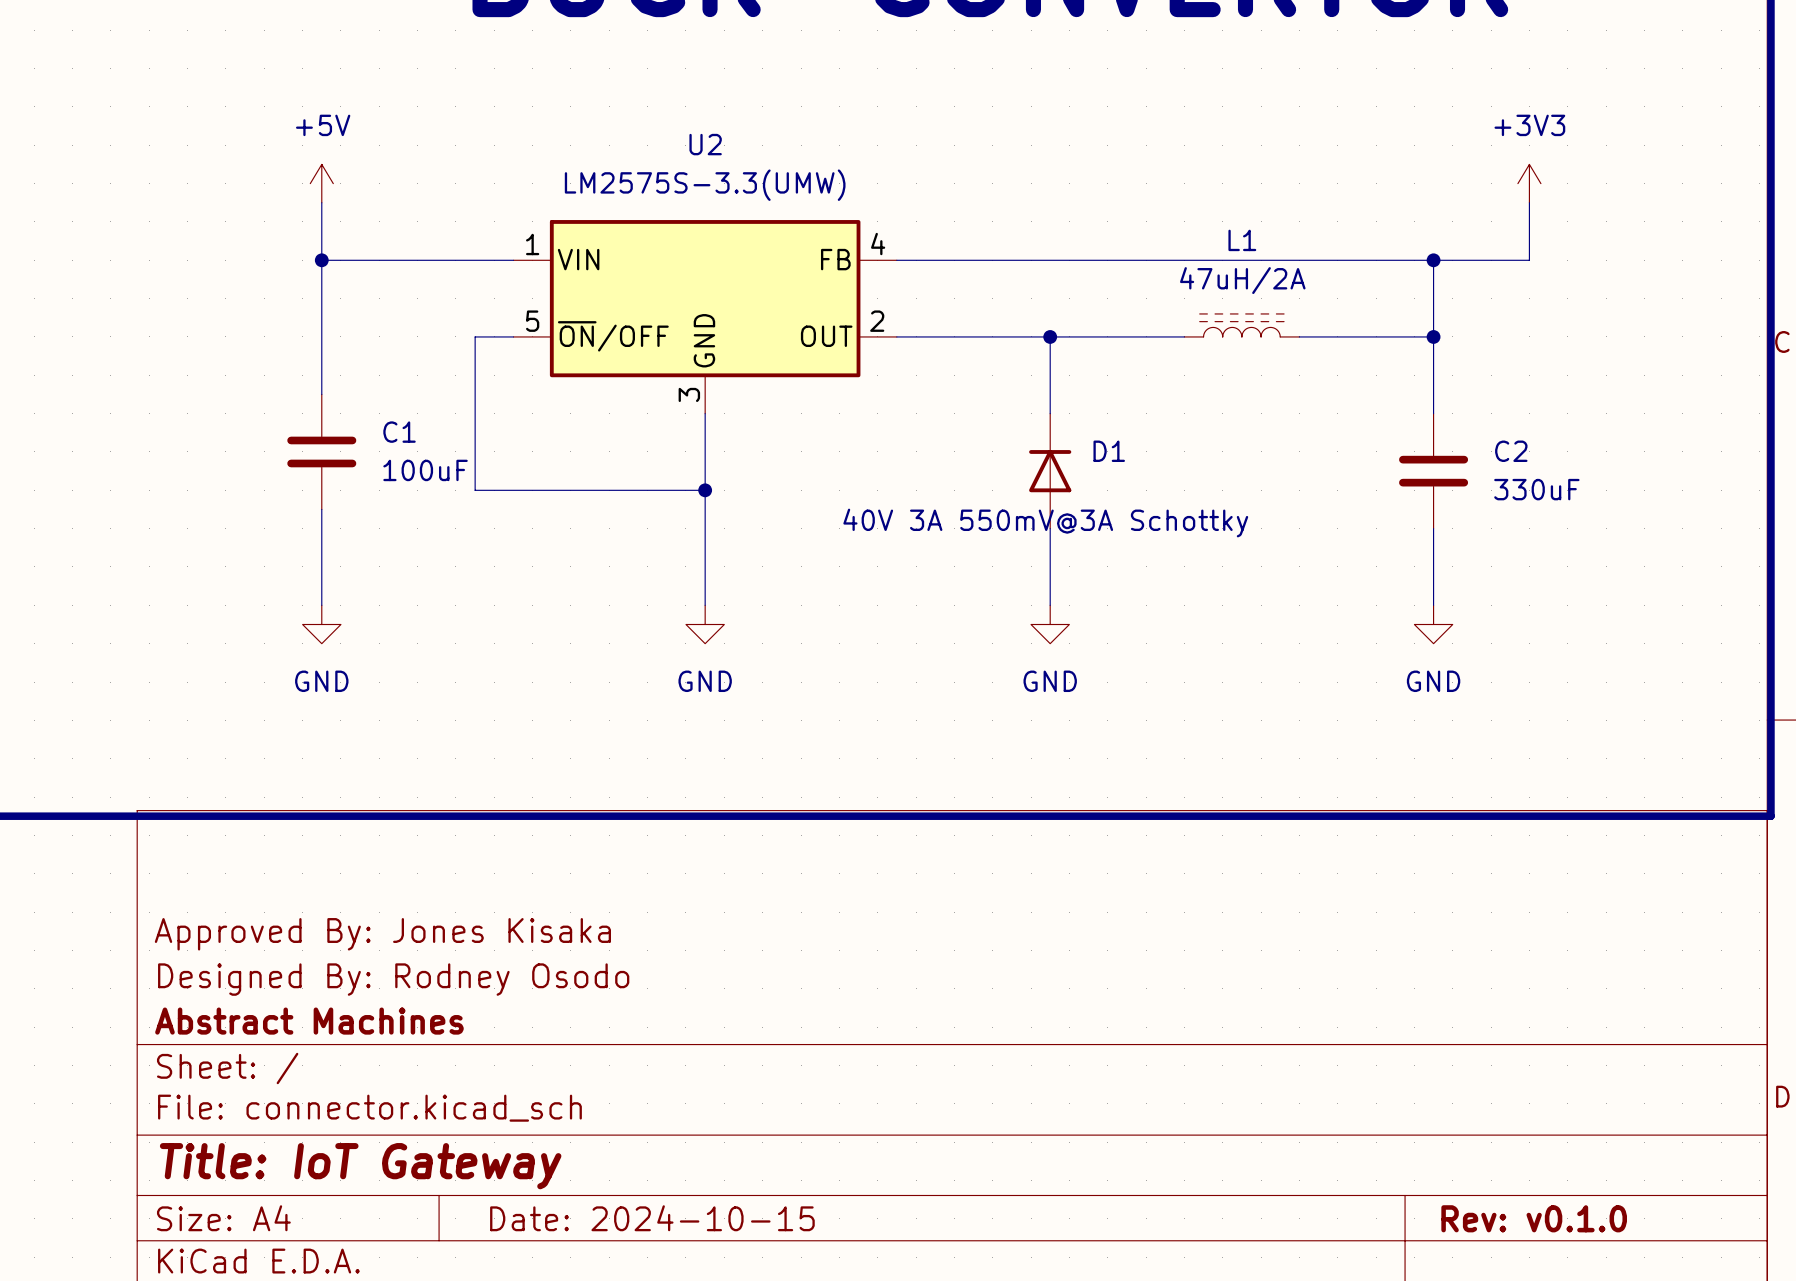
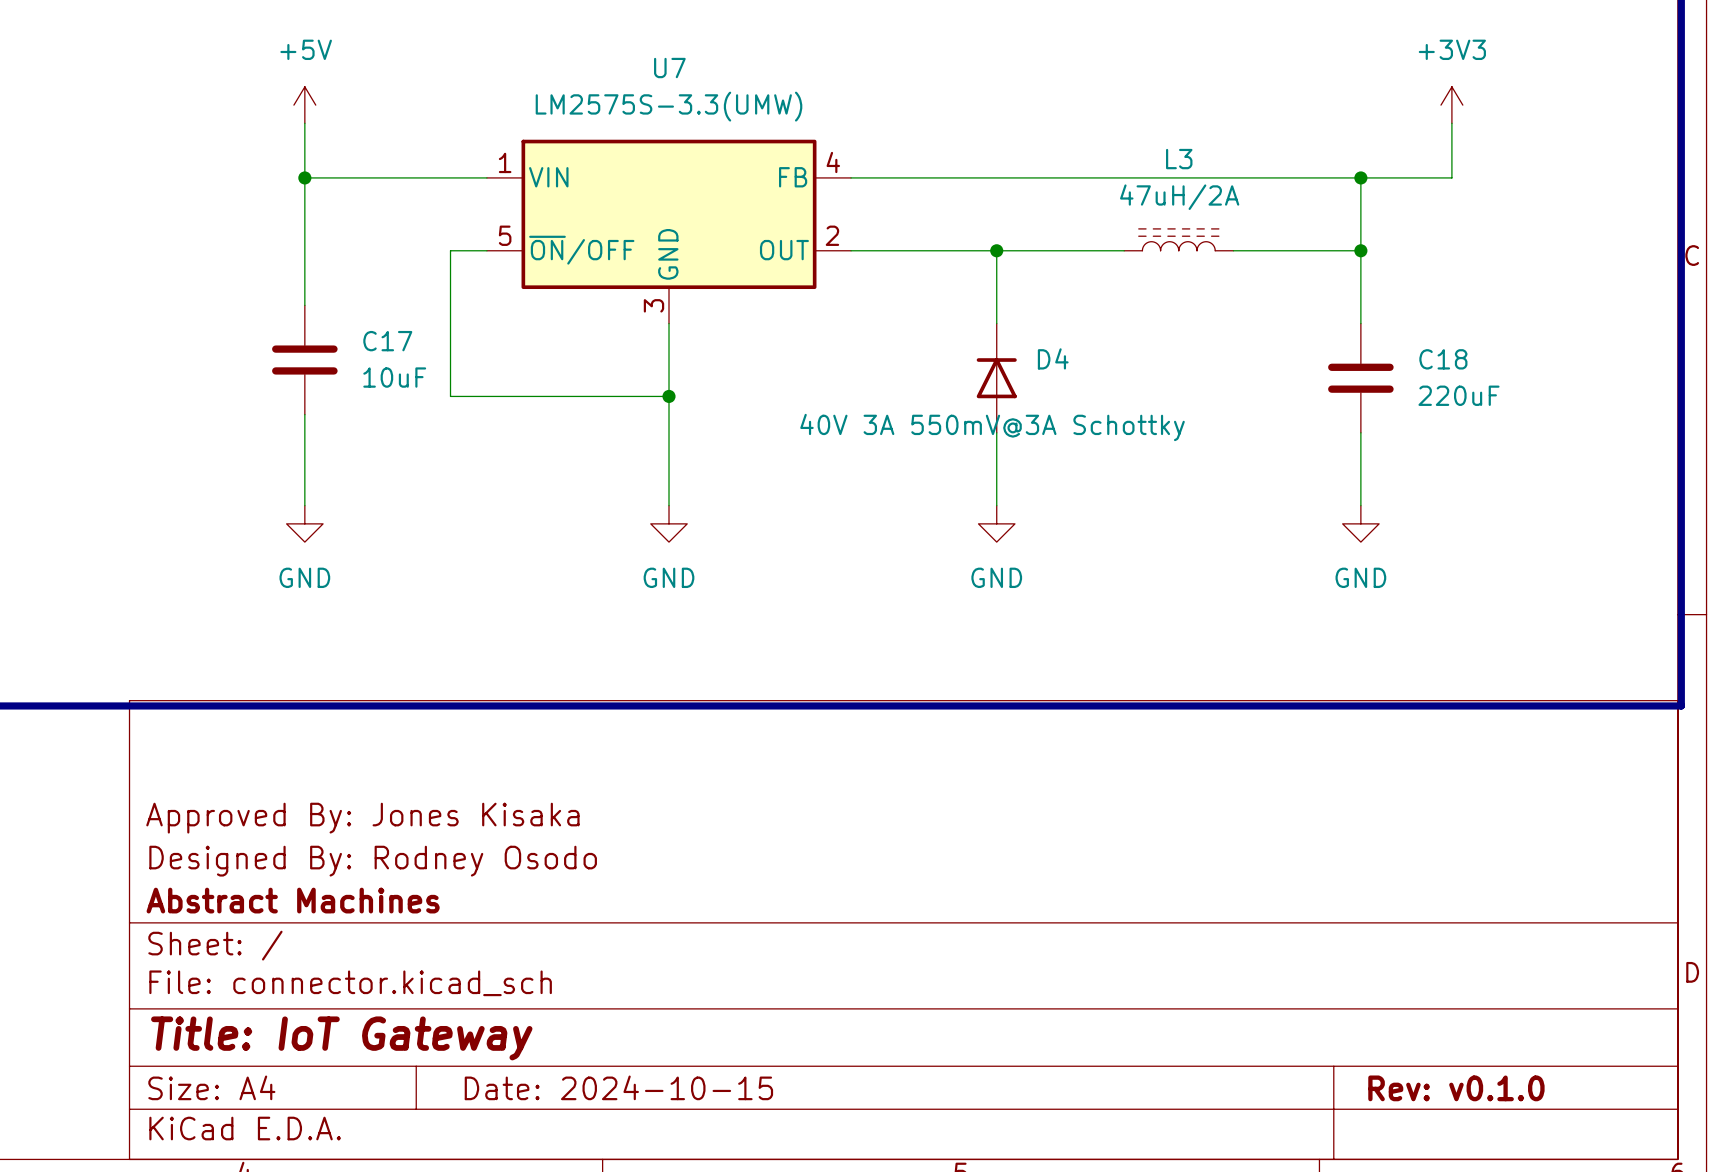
U2 name: U2 (705, 144) -> U7 (669, 68)
L1 name: L1 (1242, 240) -> L3 (1179, 159)
C1 name: C1 (399, 432) -> C17 (387, 341)
D1 name: D1 (1109, 451) -> D4 (1053, 358)
C2 name: C2 (1511, 451) -> C18 (1443, 359)
C1 value: 100uF (425, 470) -> 10uF (394, 377)
C2 value: 330uF (1536, 489) -> 220uF (1458, 395)

